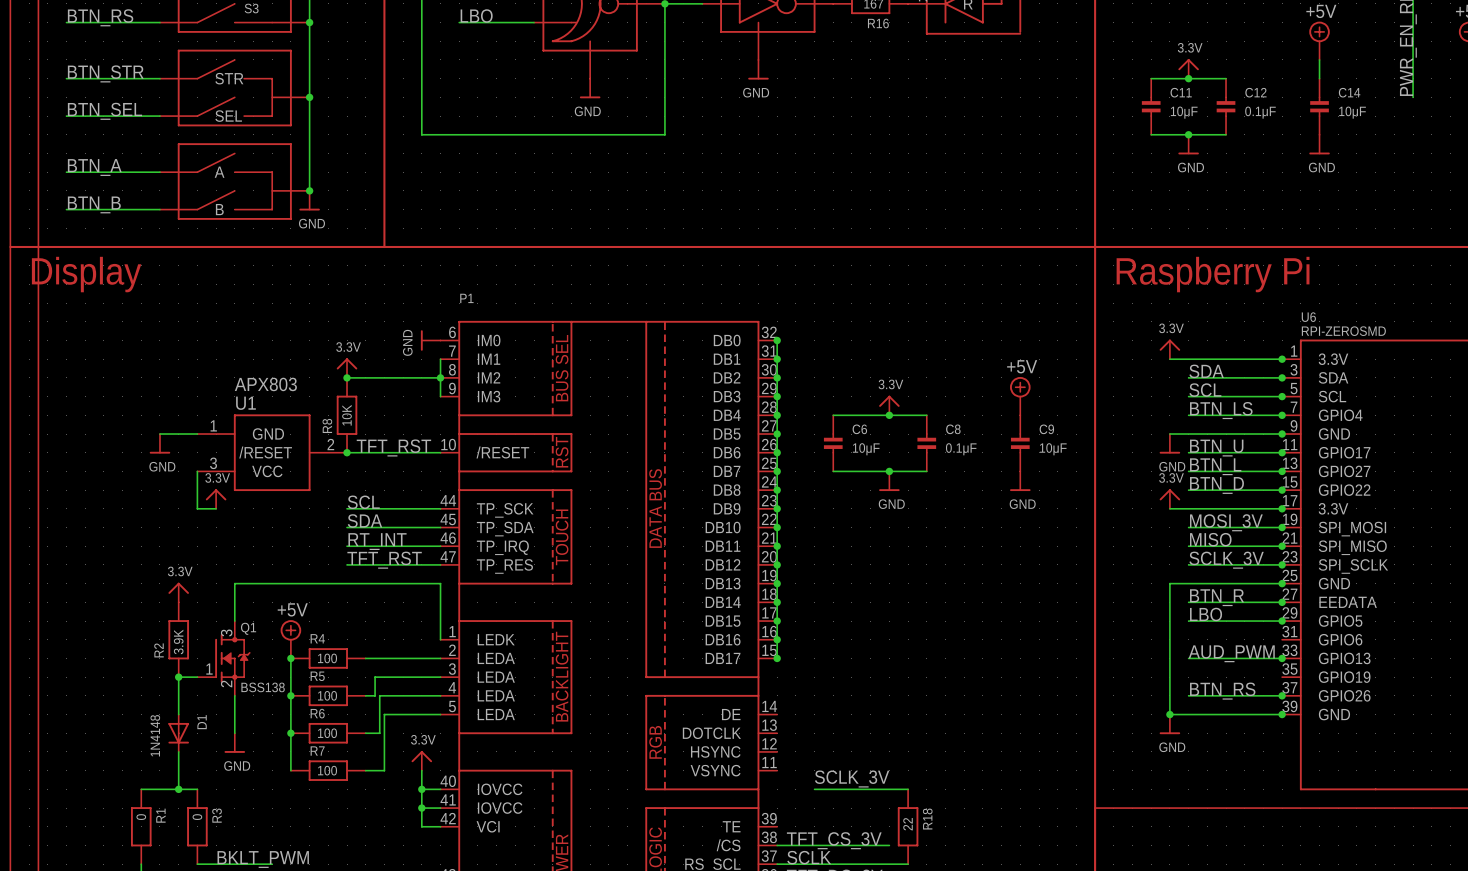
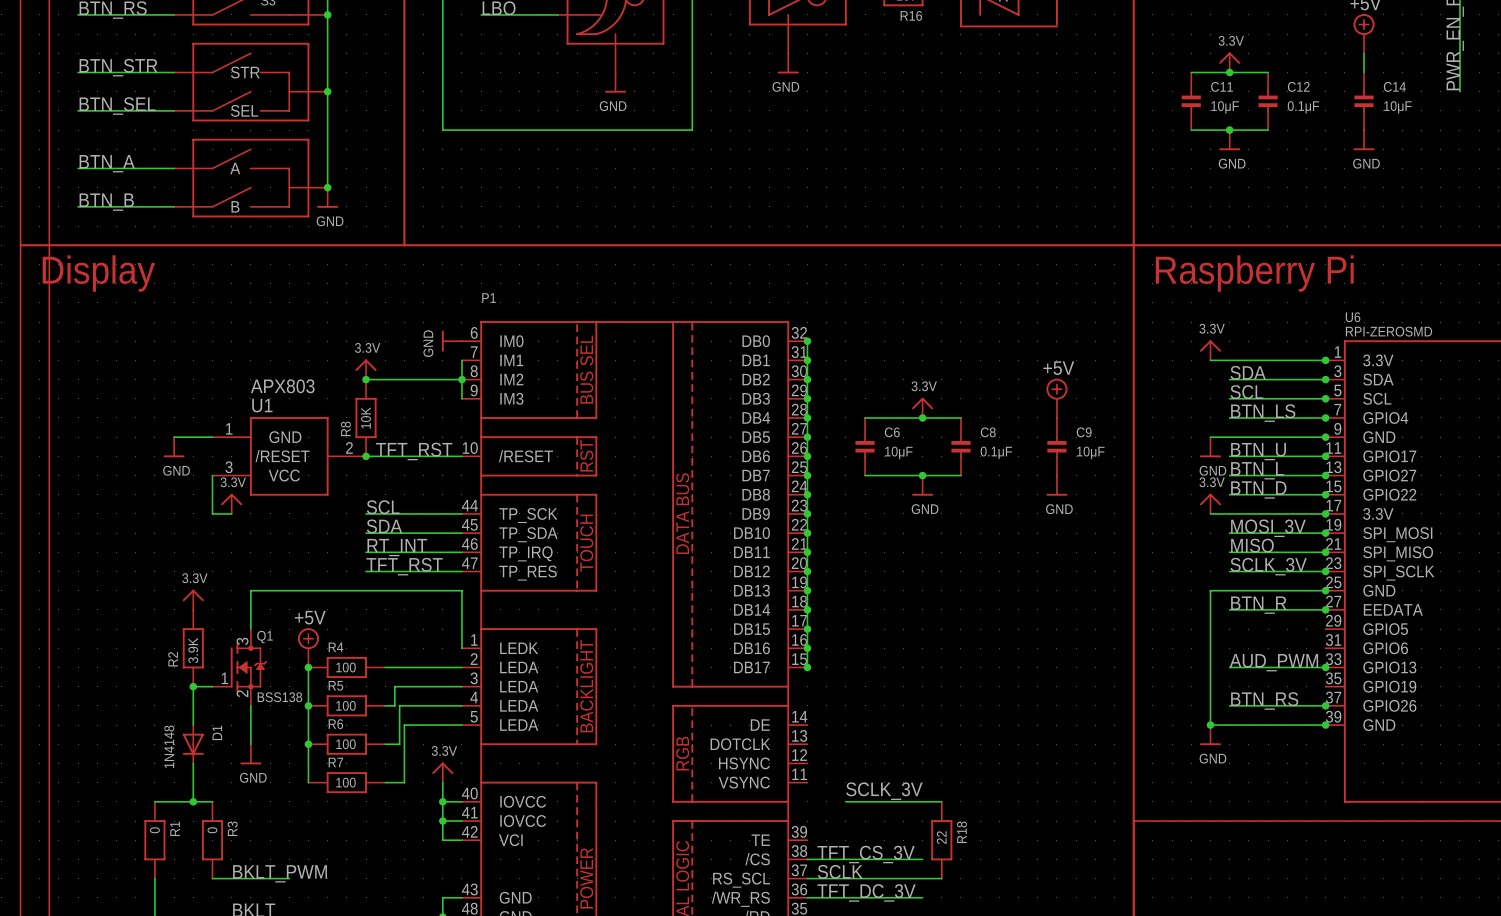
label: LBO (1206, 614) -> none
wire: (1188, 621) (1282, 621) -> none
junction: (1282, 621) -> none

